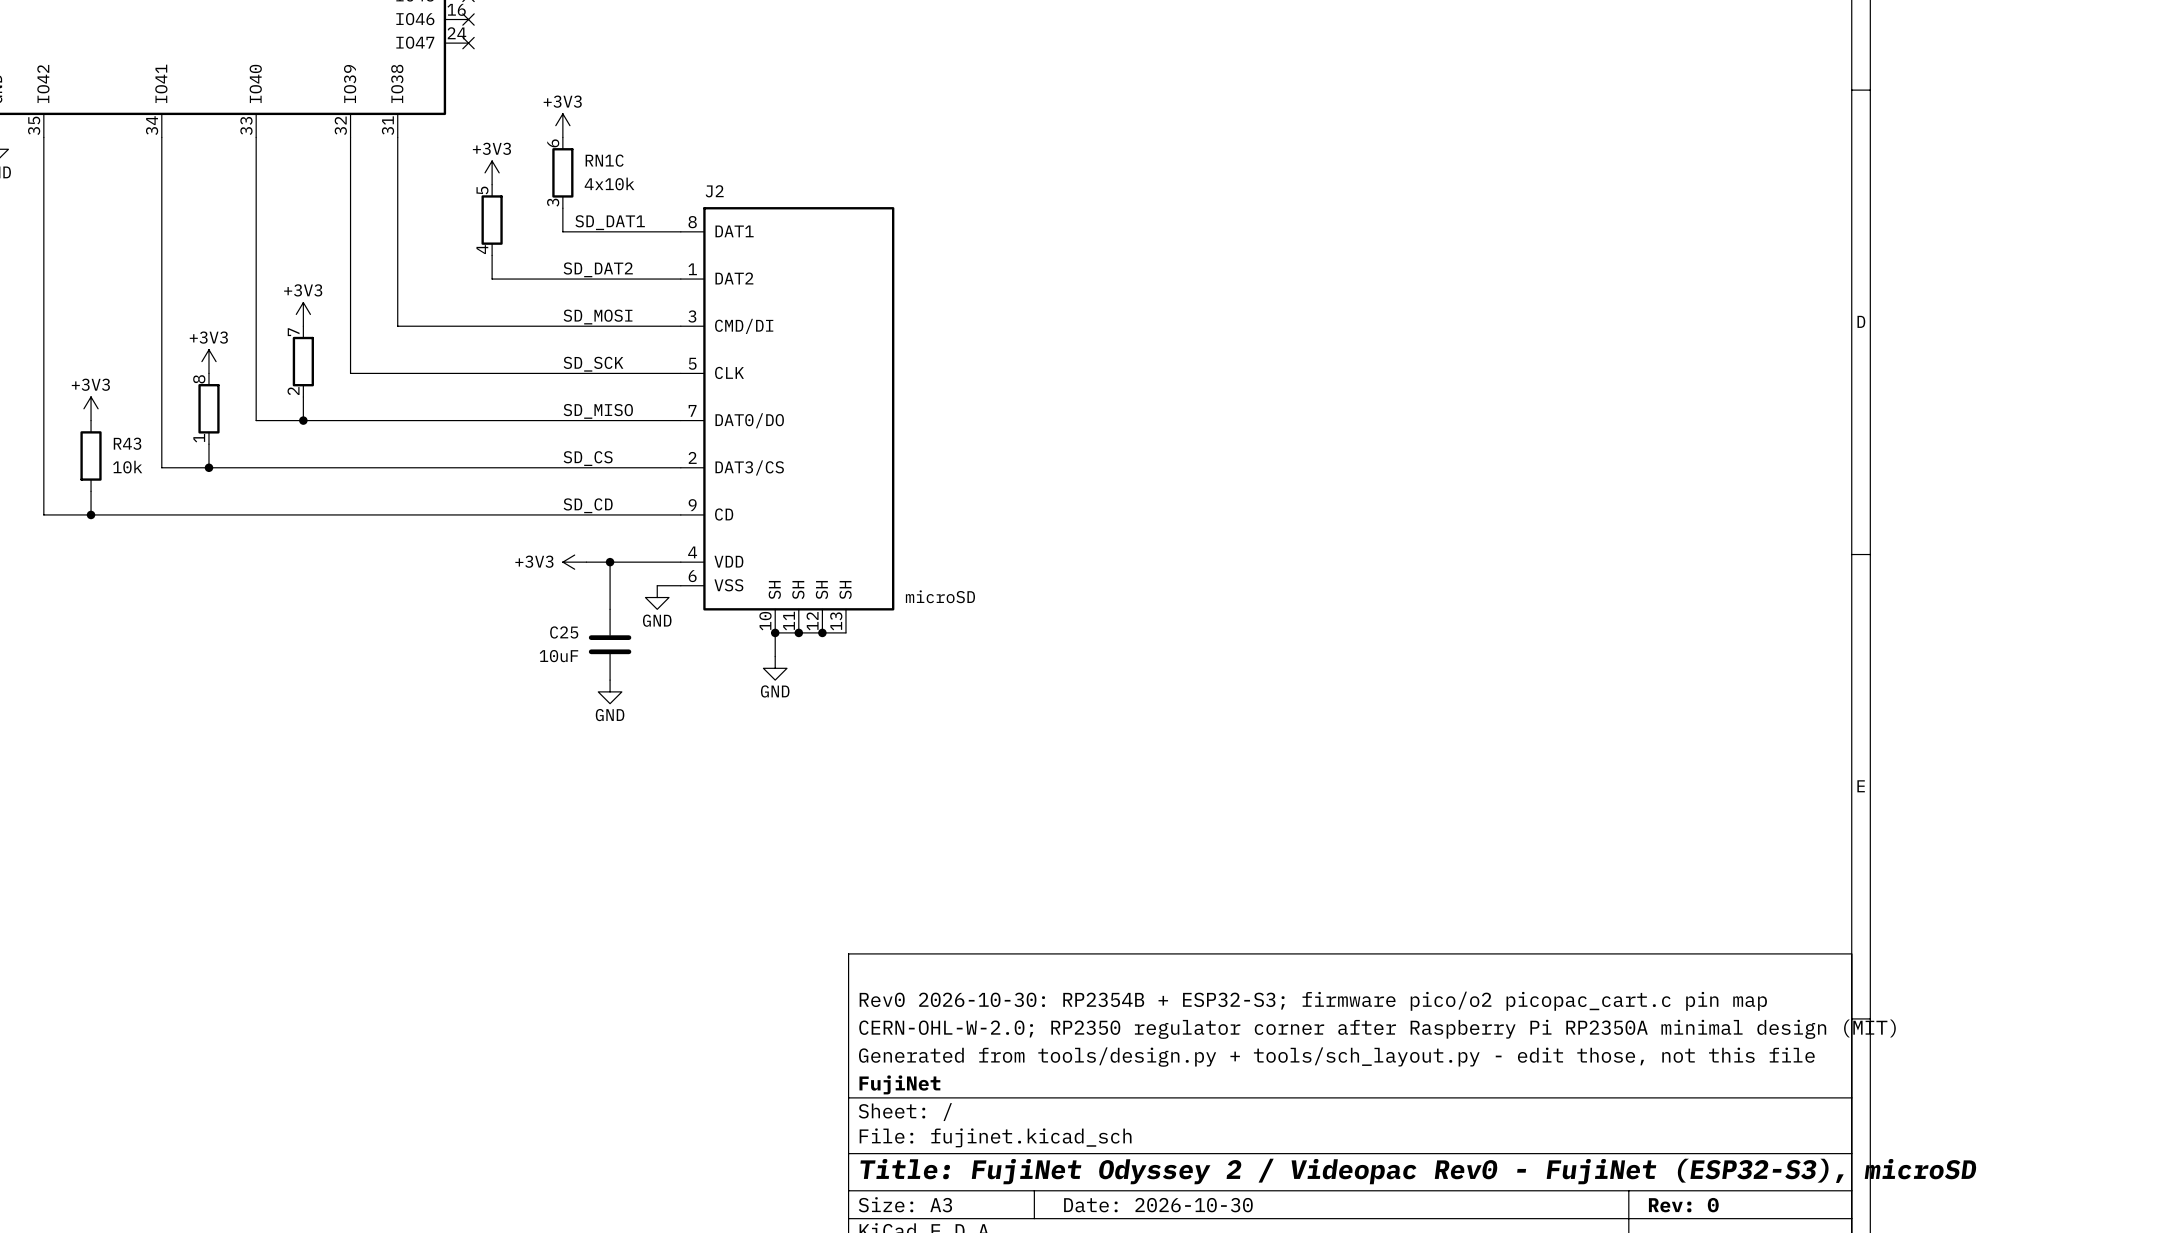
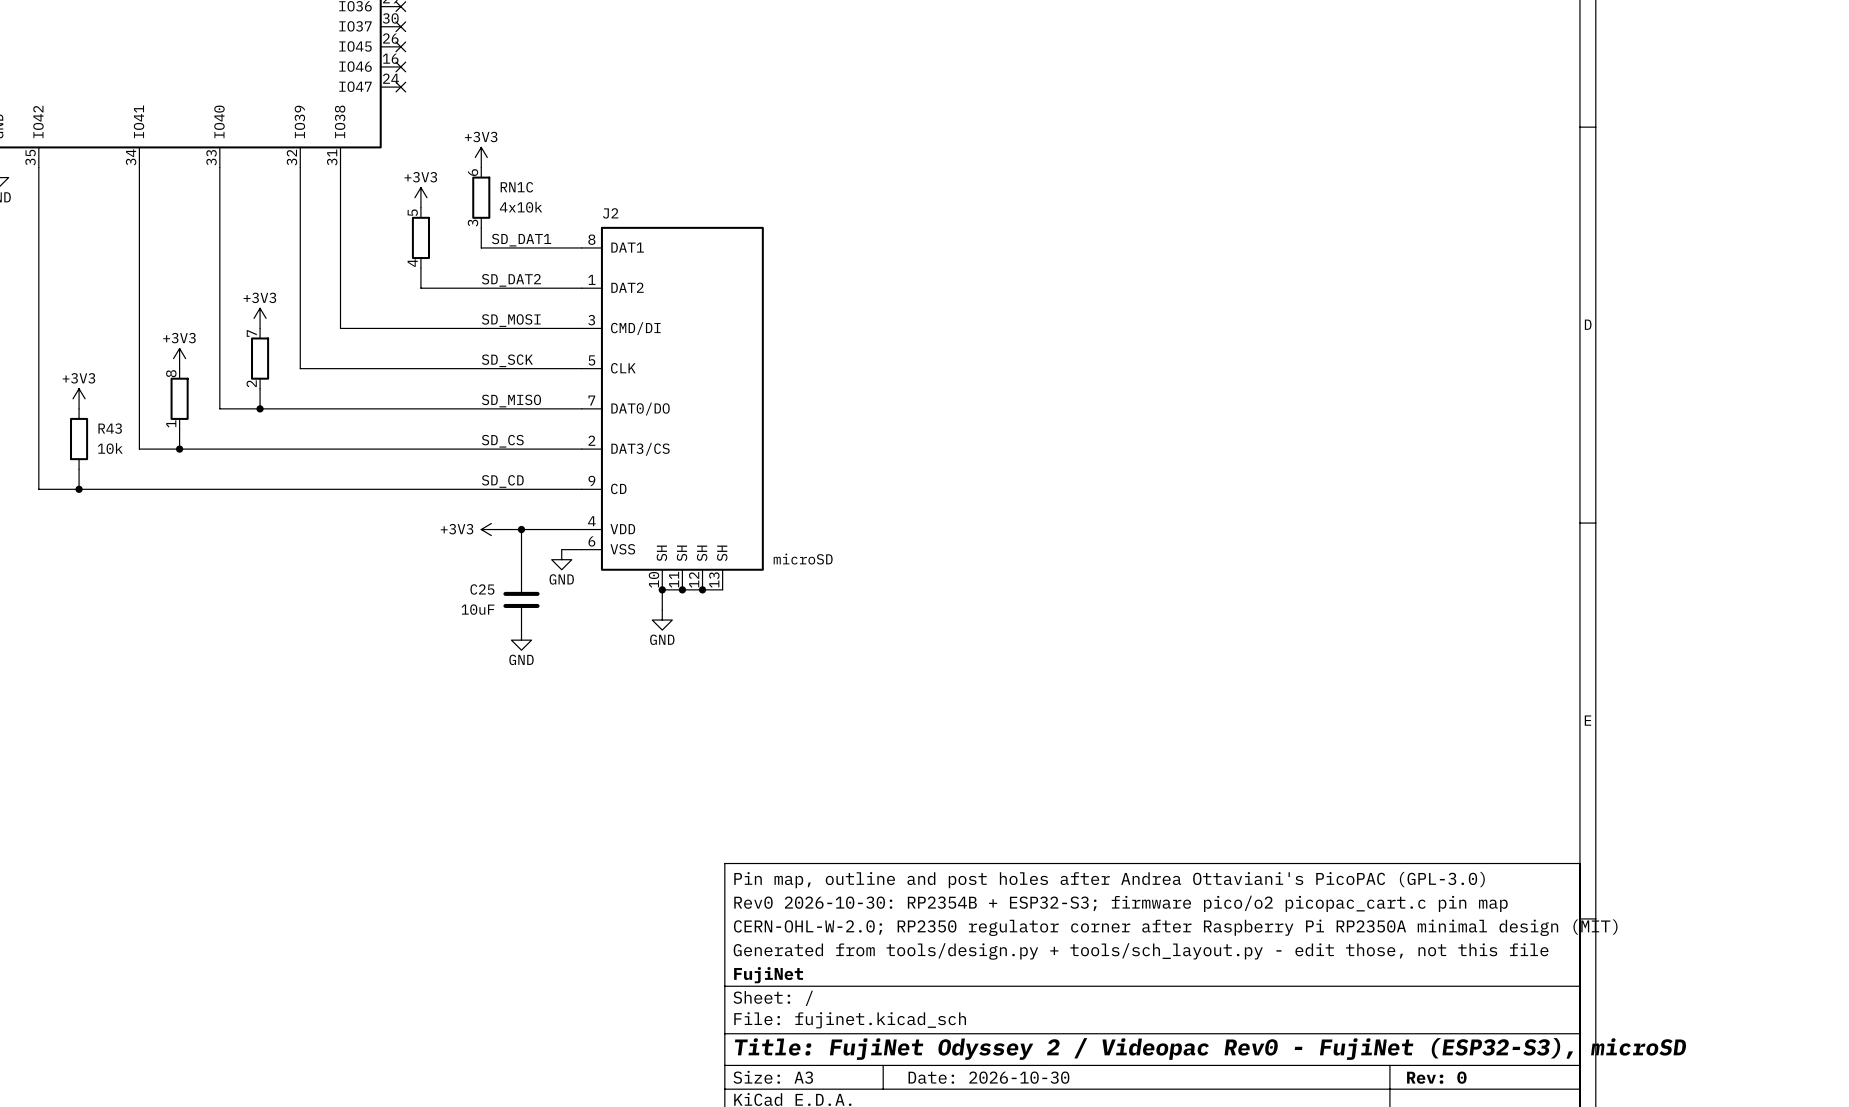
title block: none -> Pin map, outline and post holes after Andrea Ottaviani's PicoPAC (GPL-3.0) (1109, 880)

